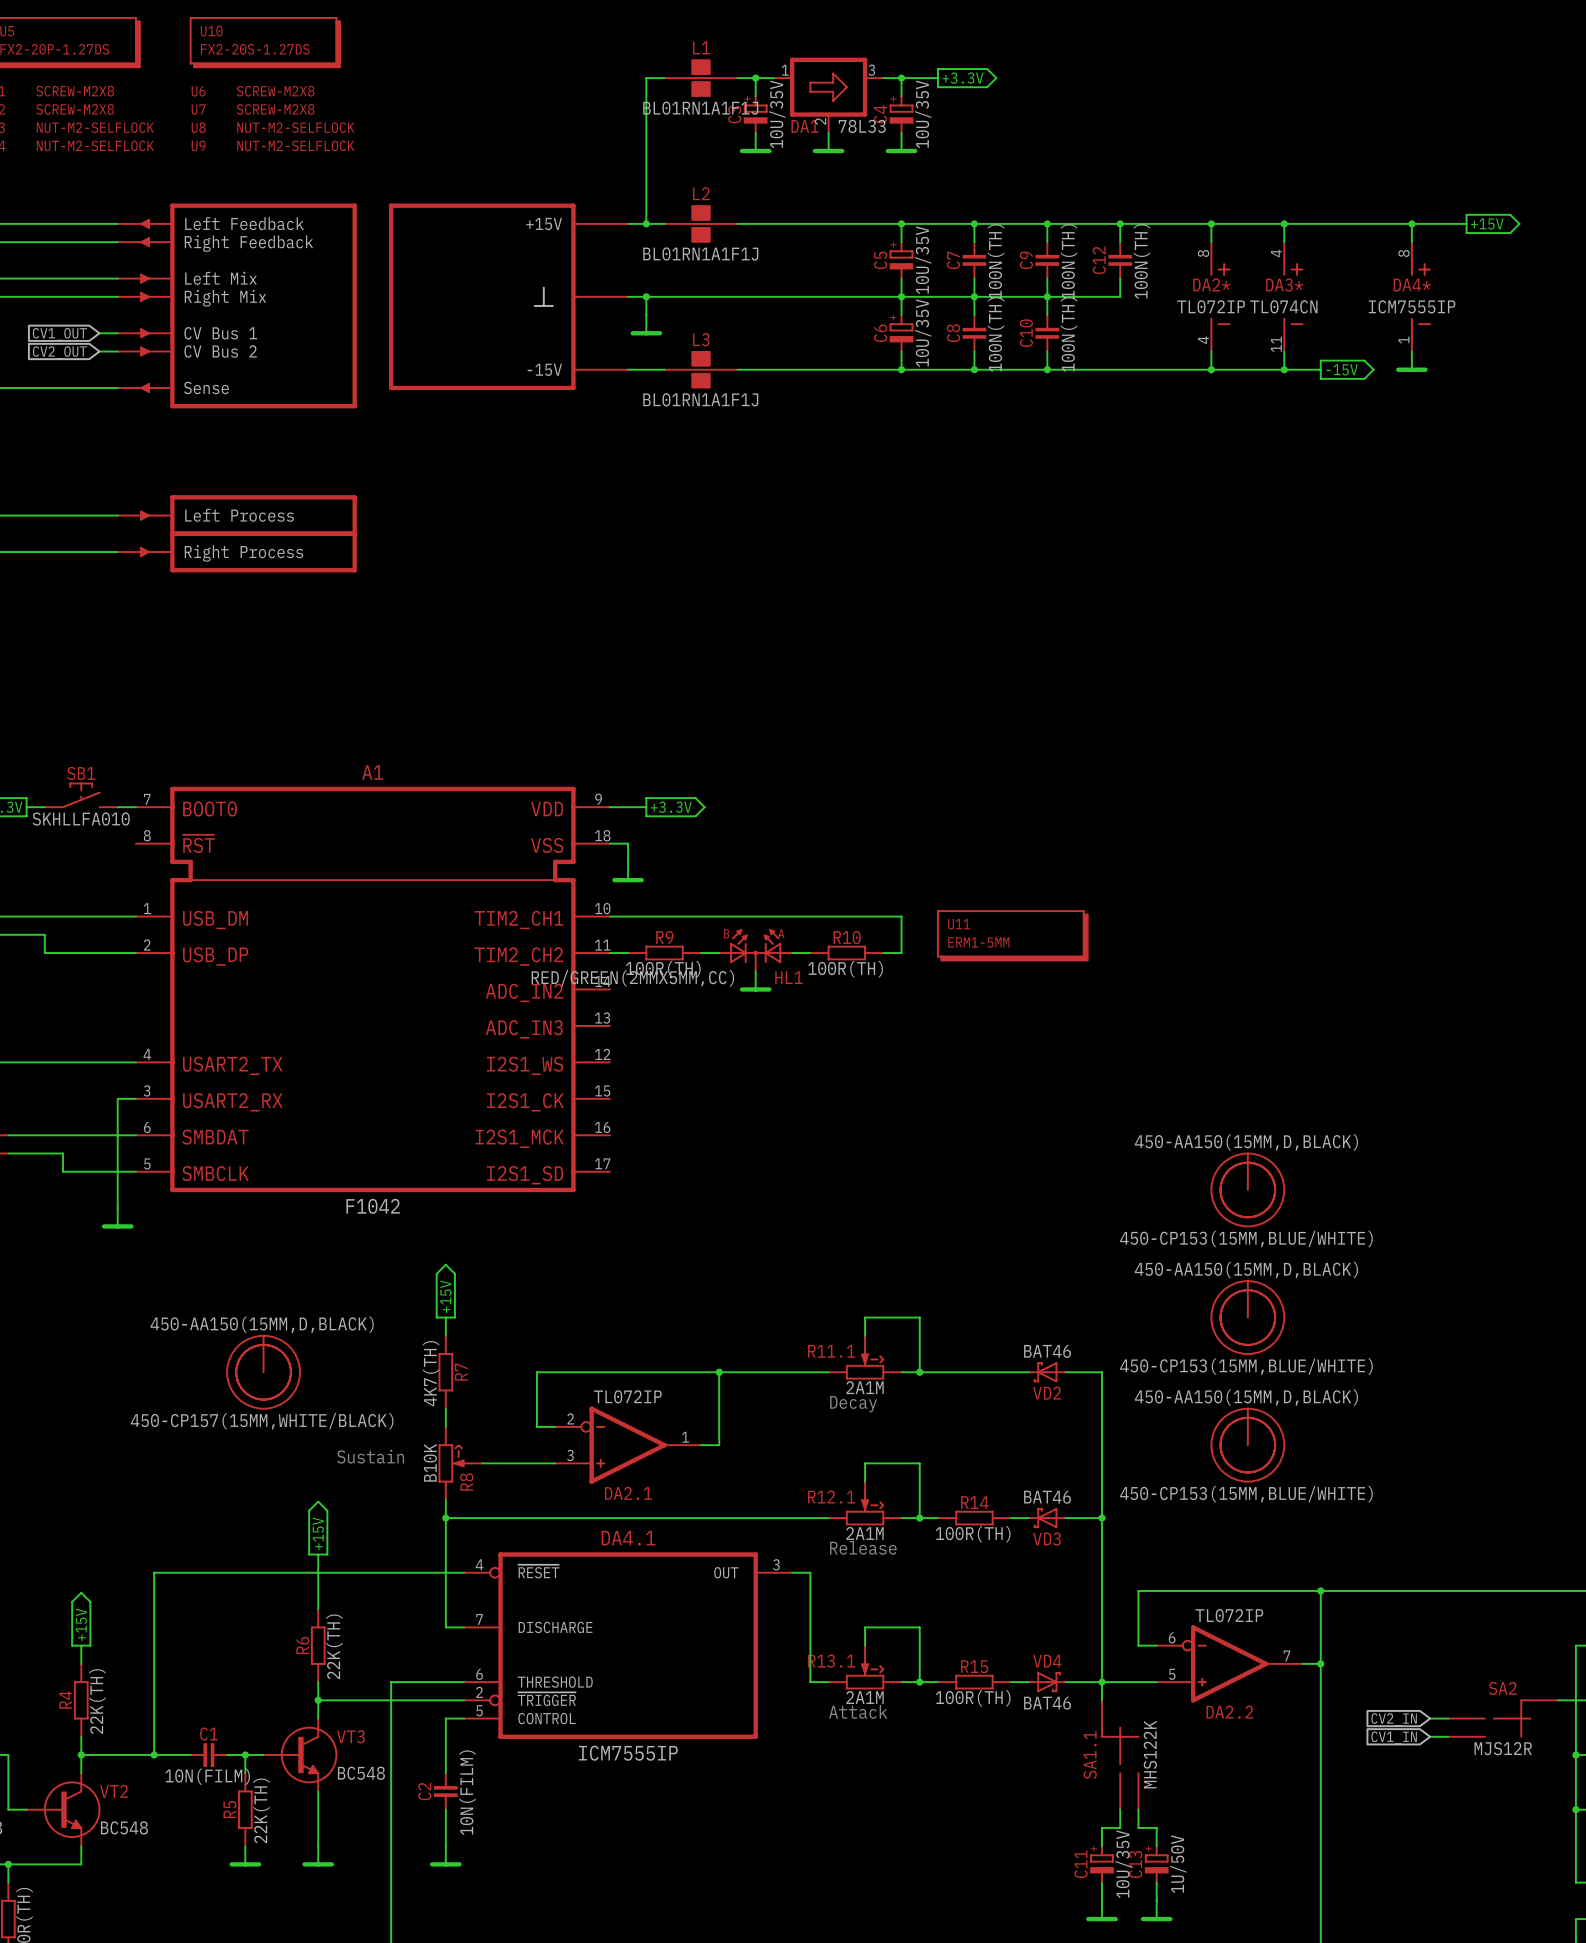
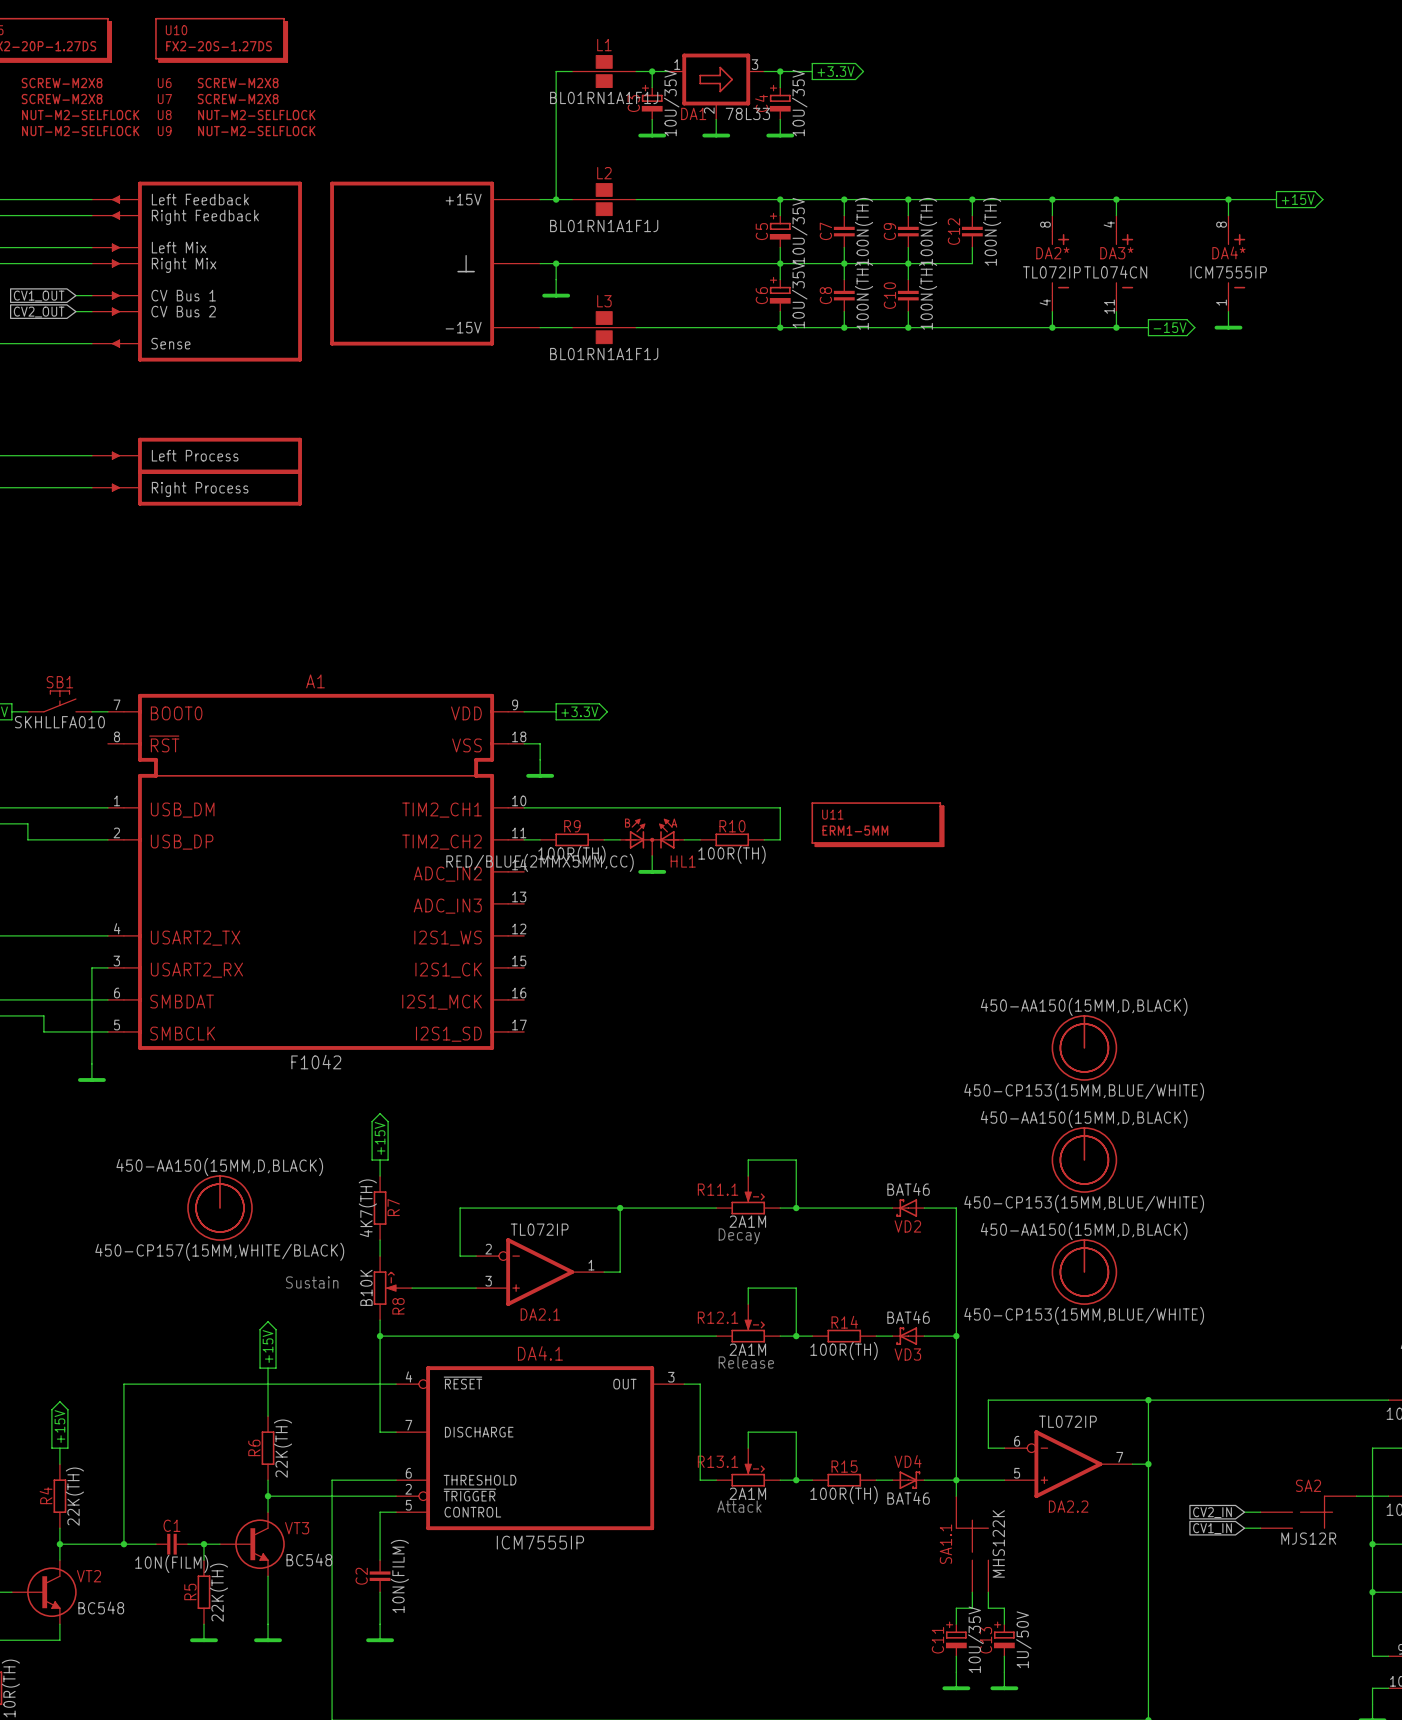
HL1 value: RED/GREEN(2MMX5MM,CC) (632, 978) -> RED/BLUE(2MMX5MM,CC) (540, 862)

